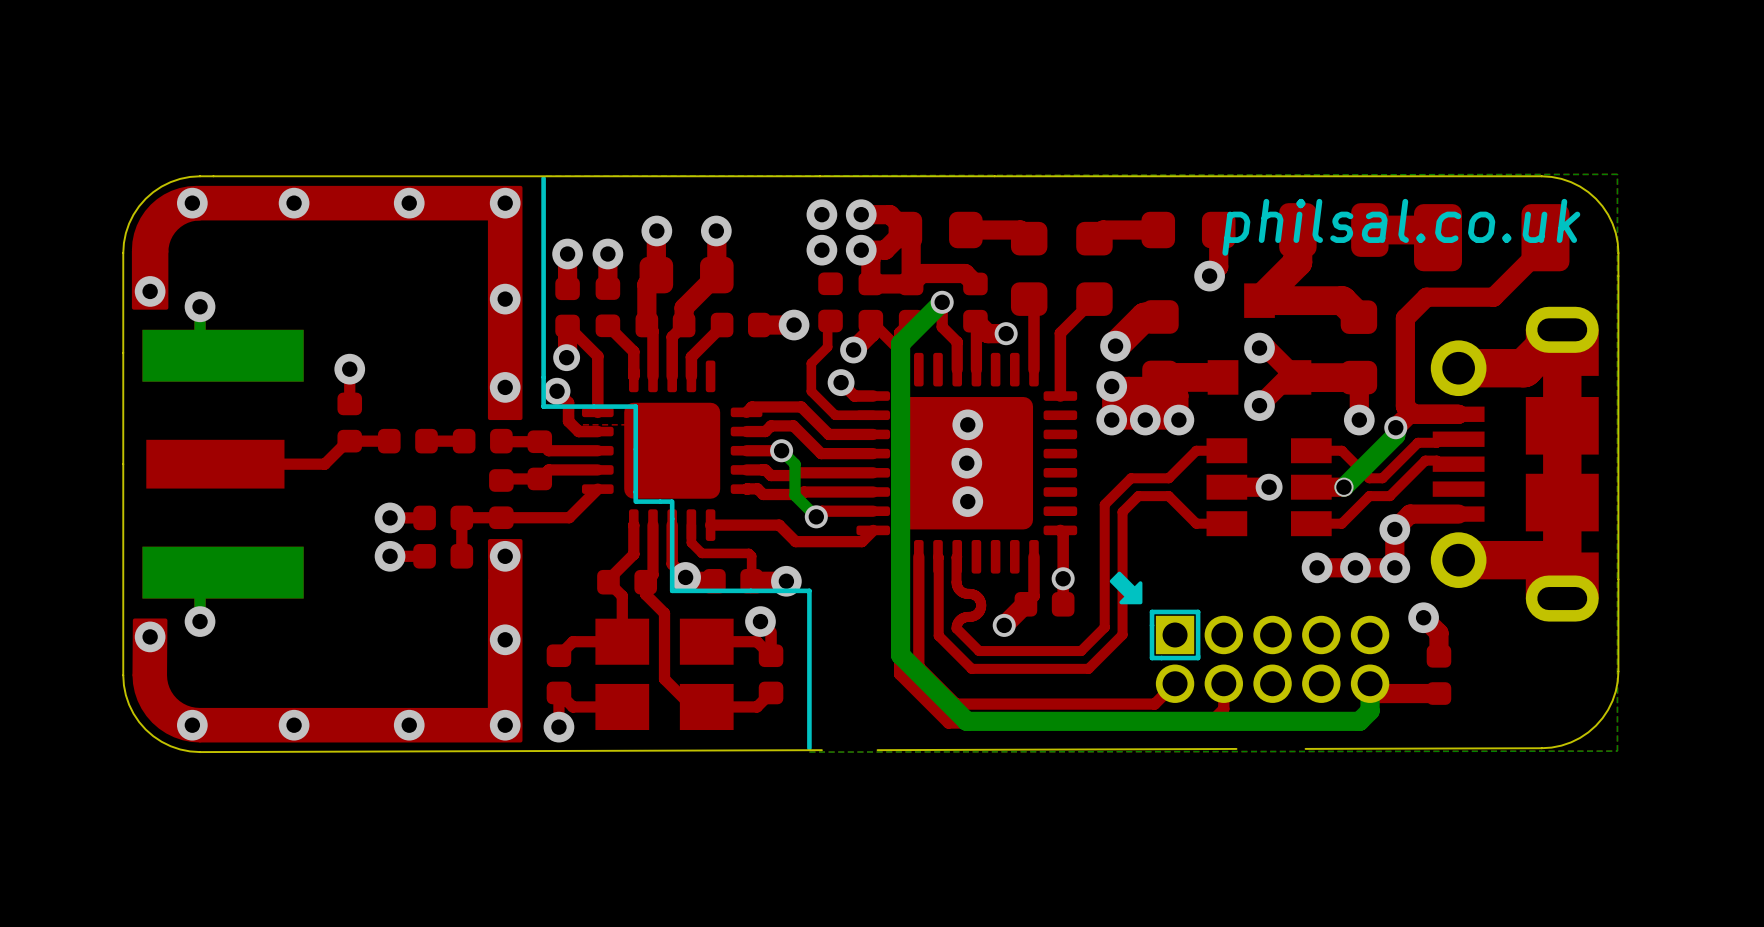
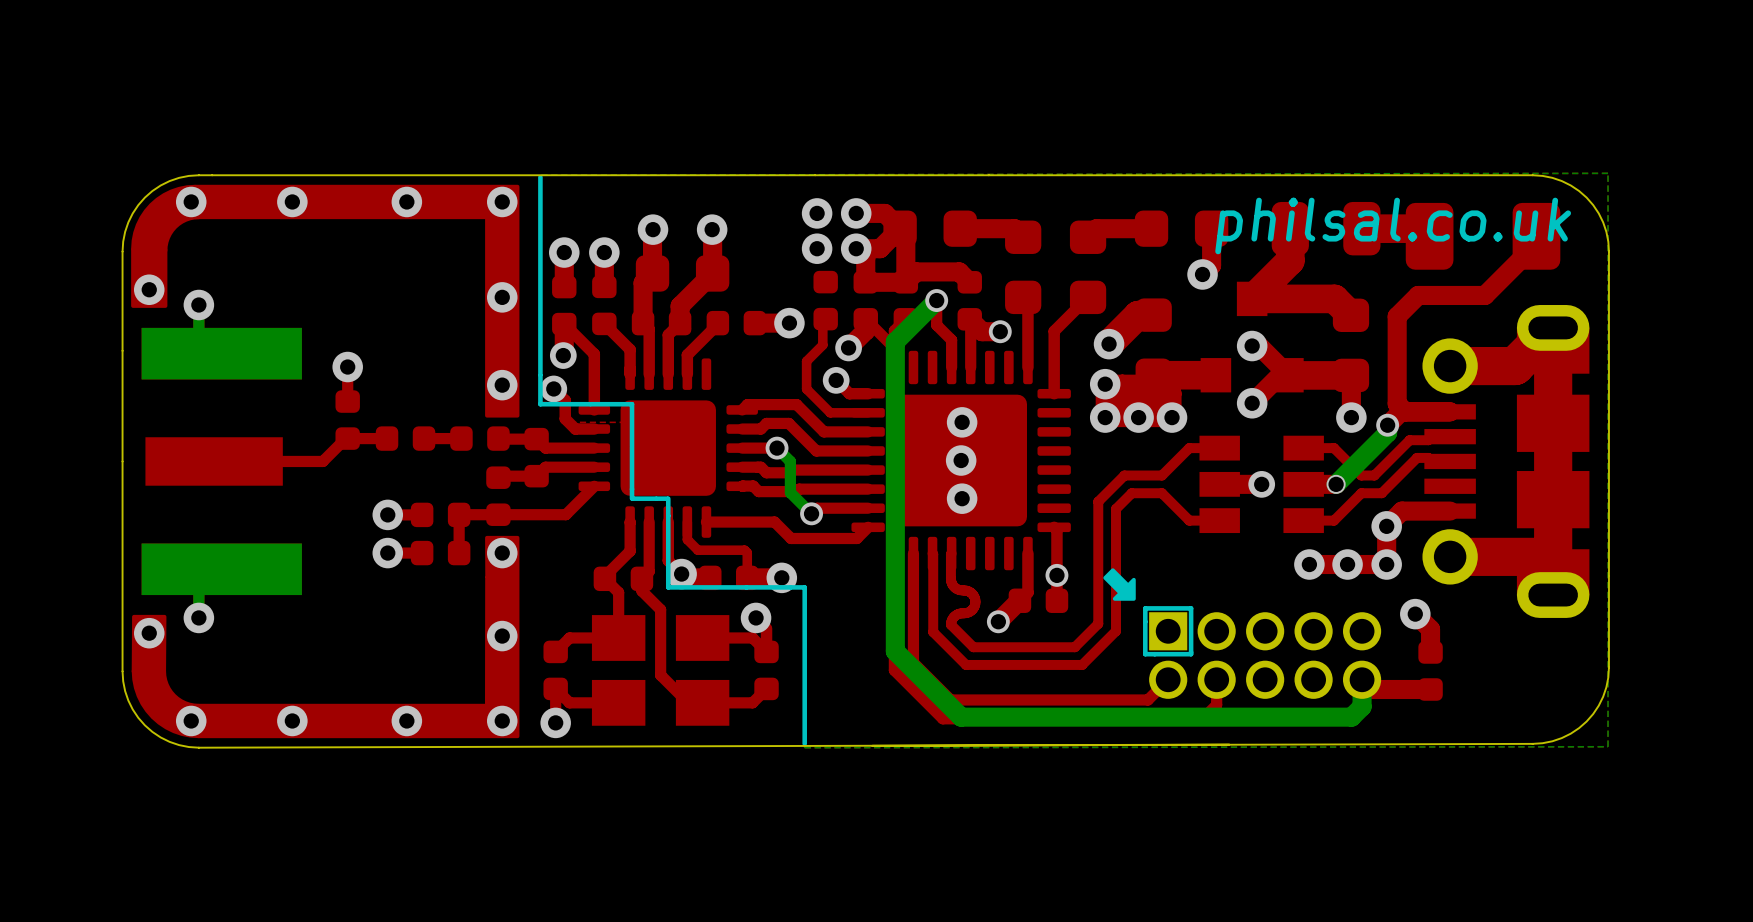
board edge: (821, 750) (200, 752) -> (1297, 744) (198, 747)

